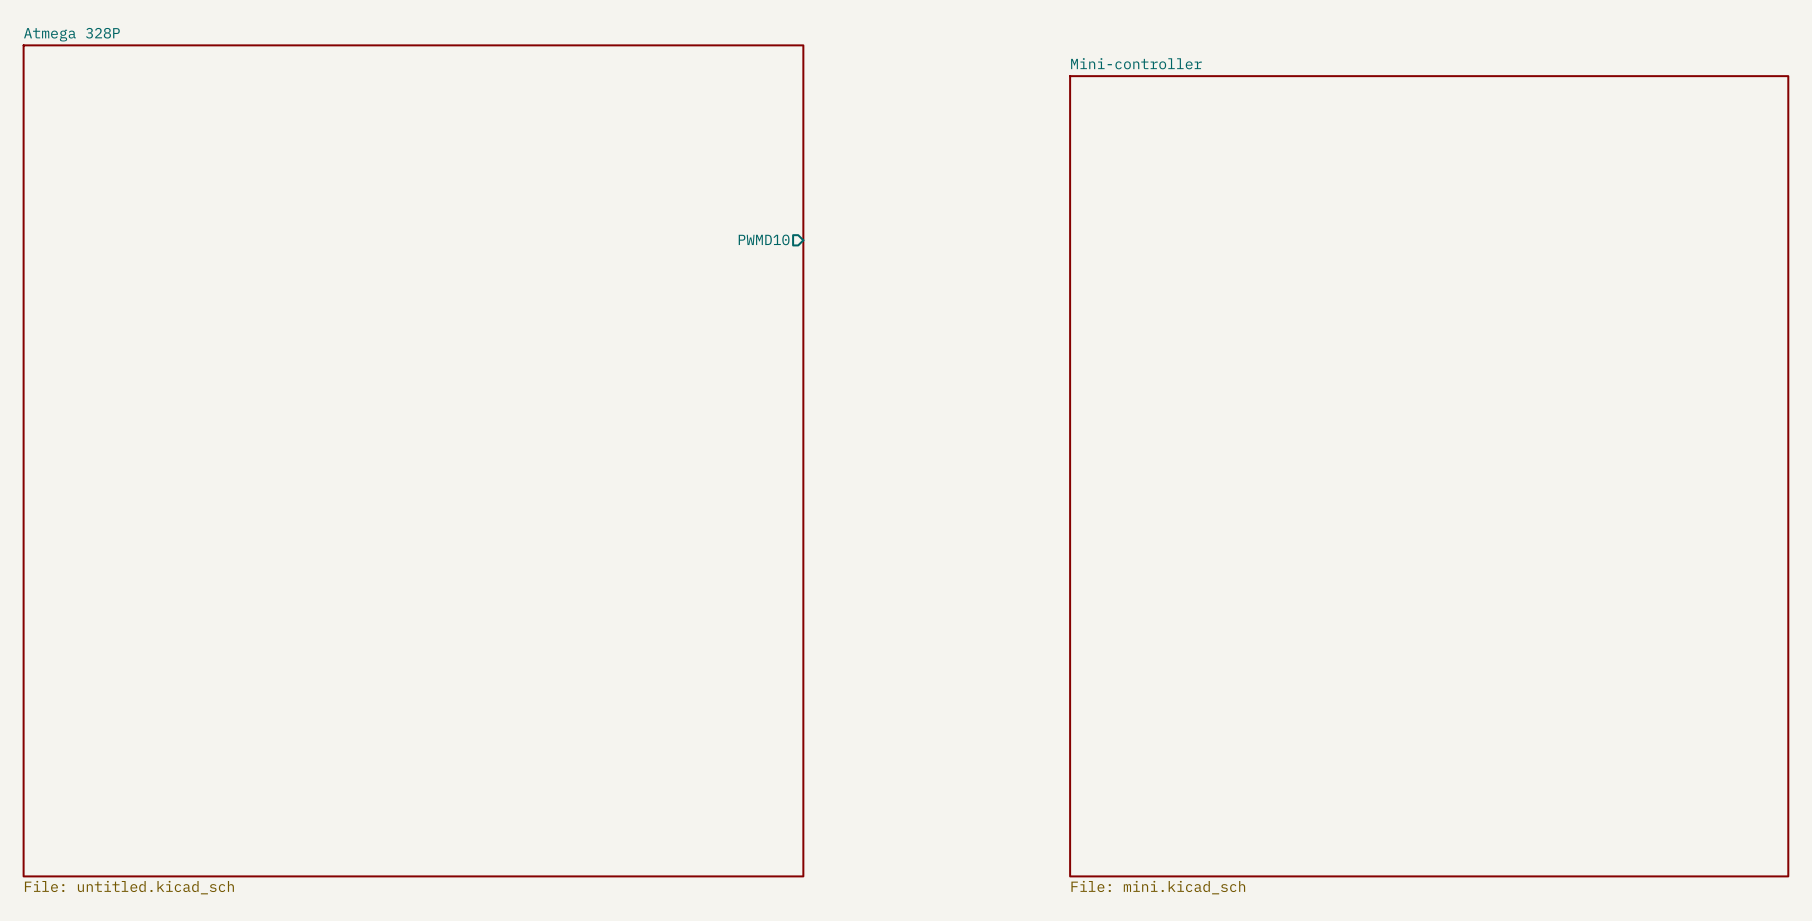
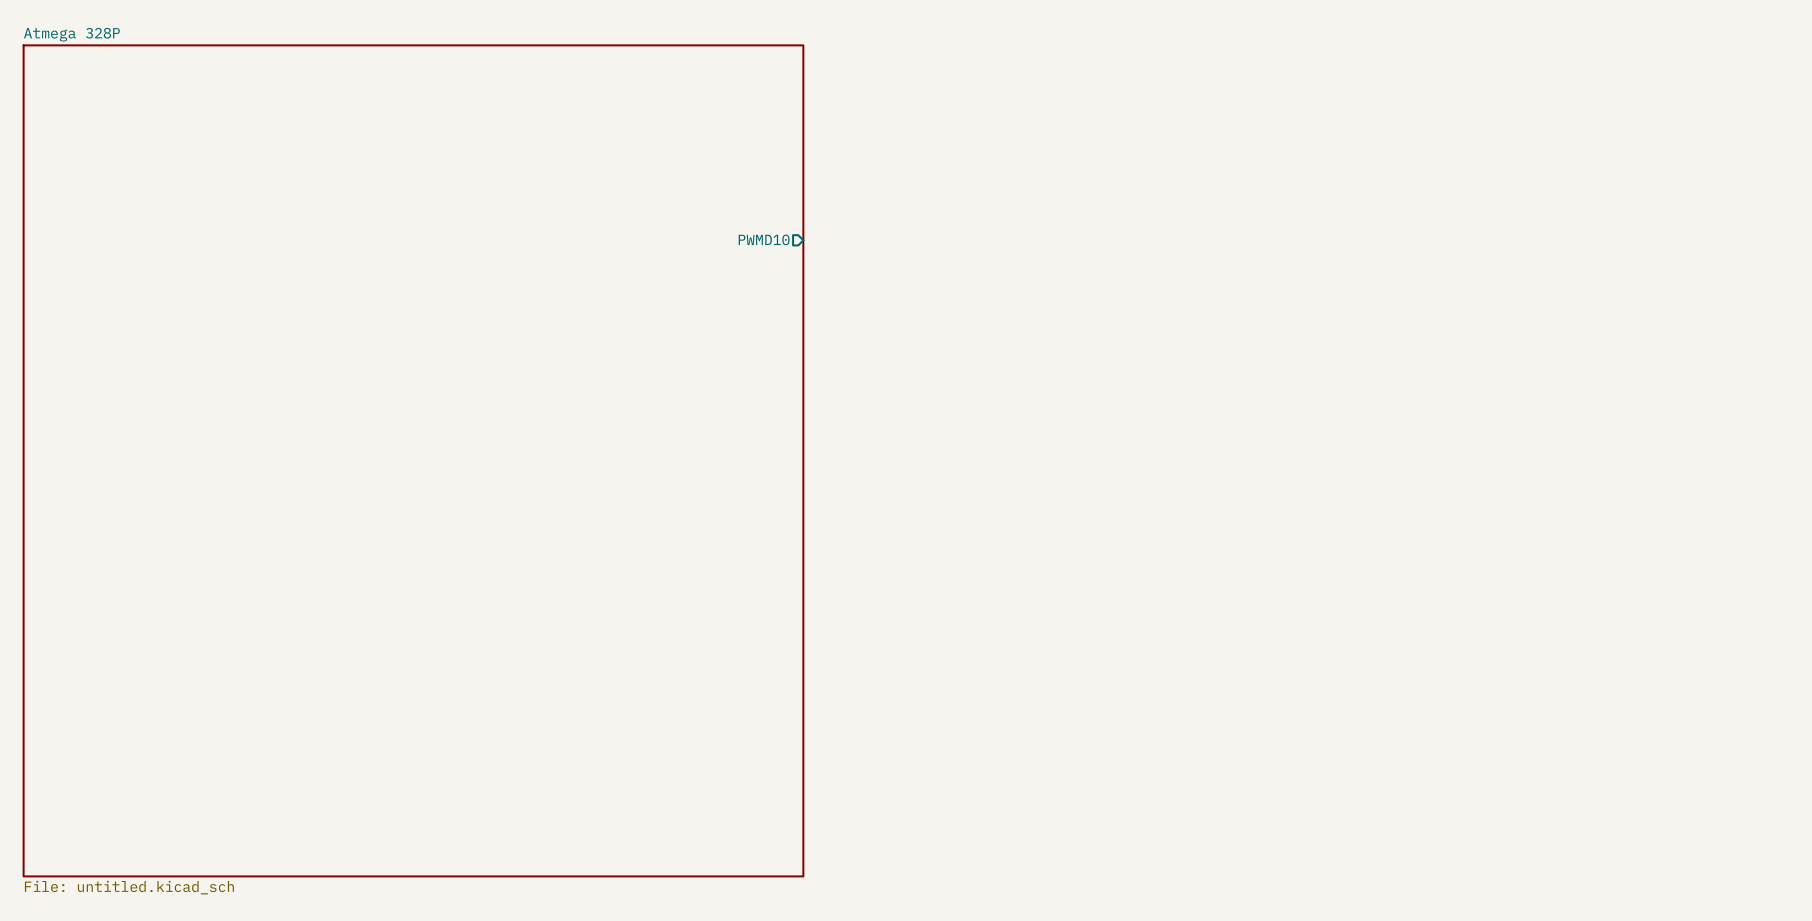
sheet Mini-controller: File: mini.kicad_sch (1429, 476) -> none

